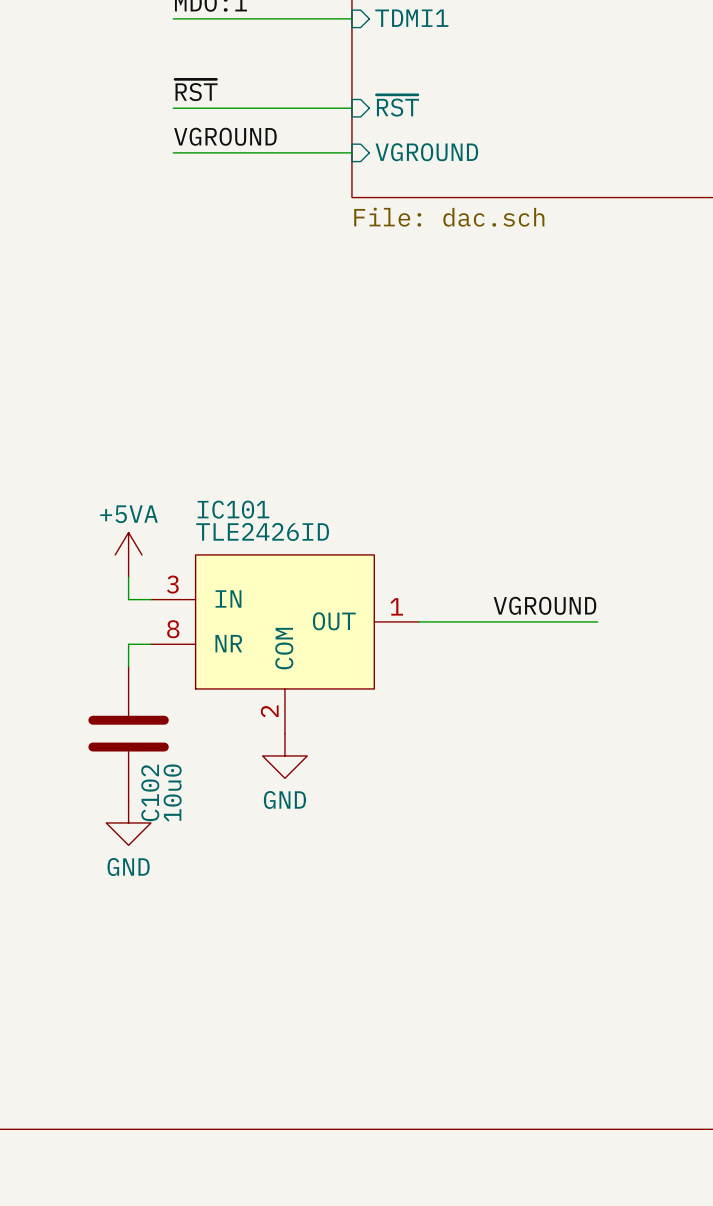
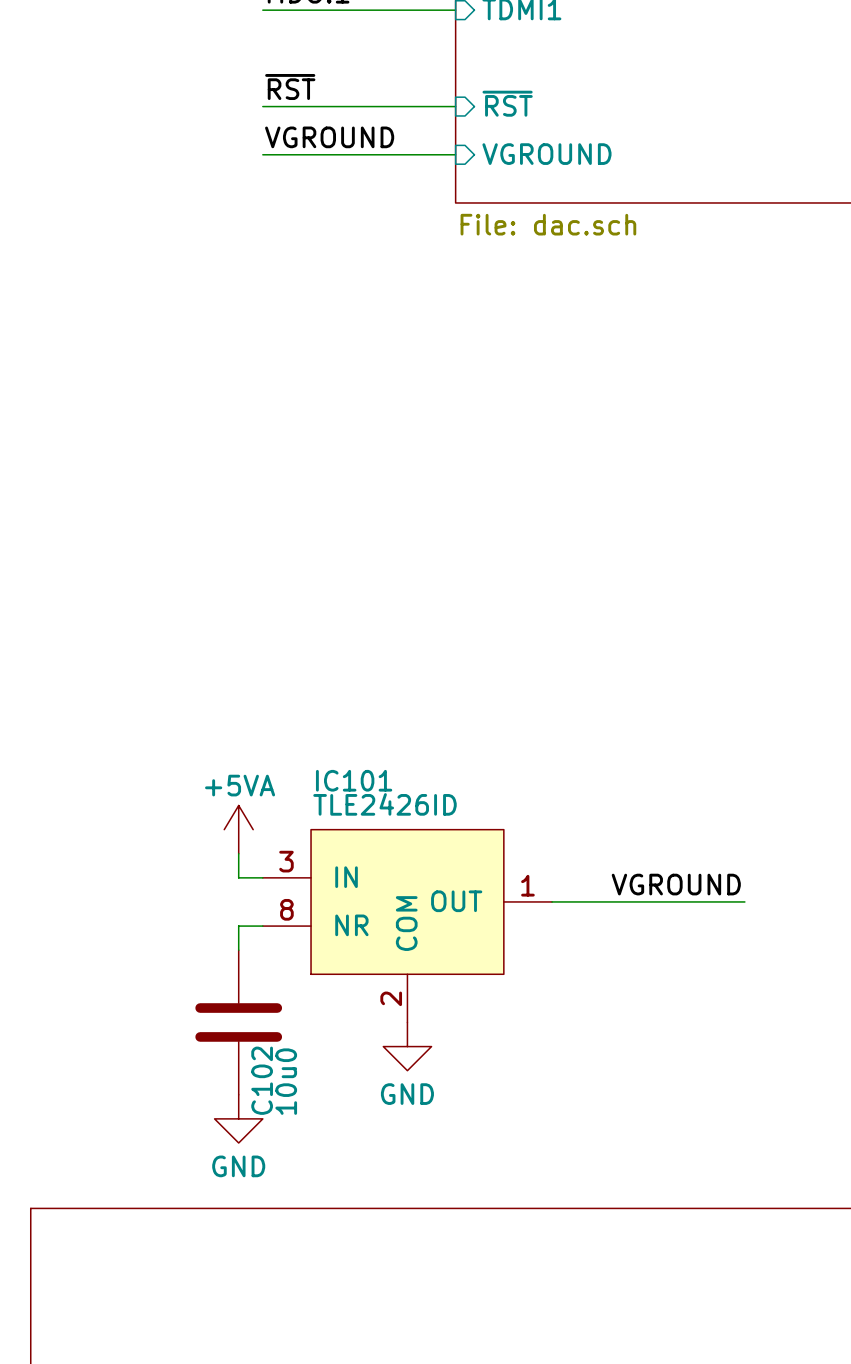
power symbol position: +5VA (128, 554) -> +5VA (238, 829)
wire: (128, 577) (128, 599) (150, 599) -> (238, 853) (238, 877) (262, 877)
label position: VGROUND (544, 605) -> VGROUND (676, 884)
wire: (418, 621) (597, 621) -> (552, 901) (744, 901)
wire: (150, 644) (128, 644) (128, 666) -> (262, 926) (238, 926) (238, 950)
IC101 position: (284, 644) -> (407, 926)
C102 position: (128, 733) -> (238, 1022)
power symbol: GND (284, 755) -> none
power symbol: GND (128, 822) -> none
power symbol: none -> GND (407, 1046)
power symbol: none -> GND (238, 1118)

